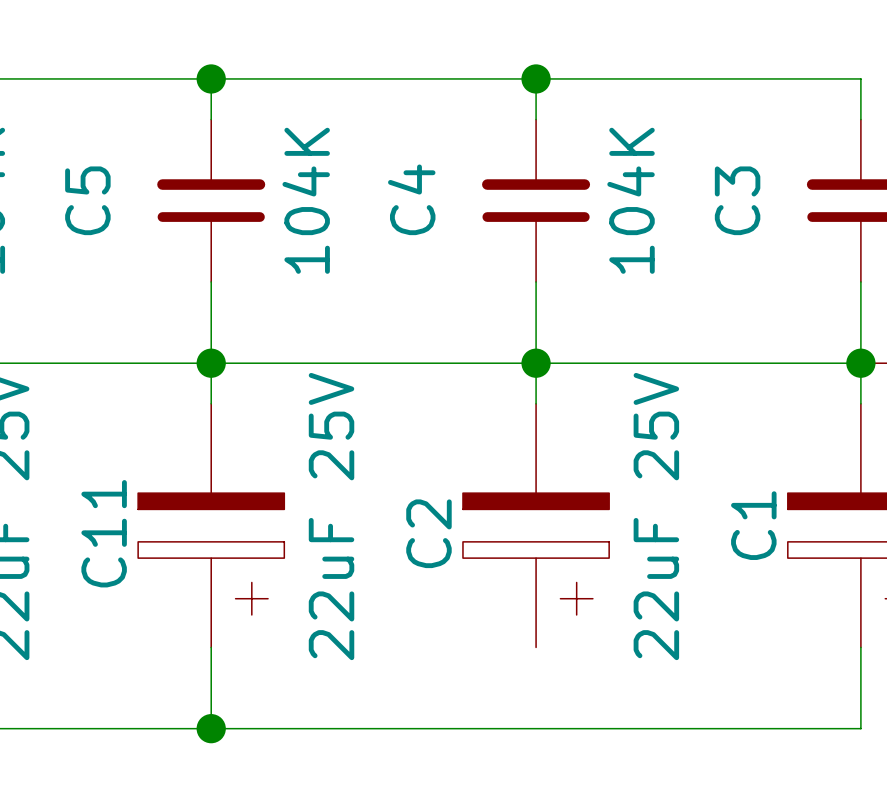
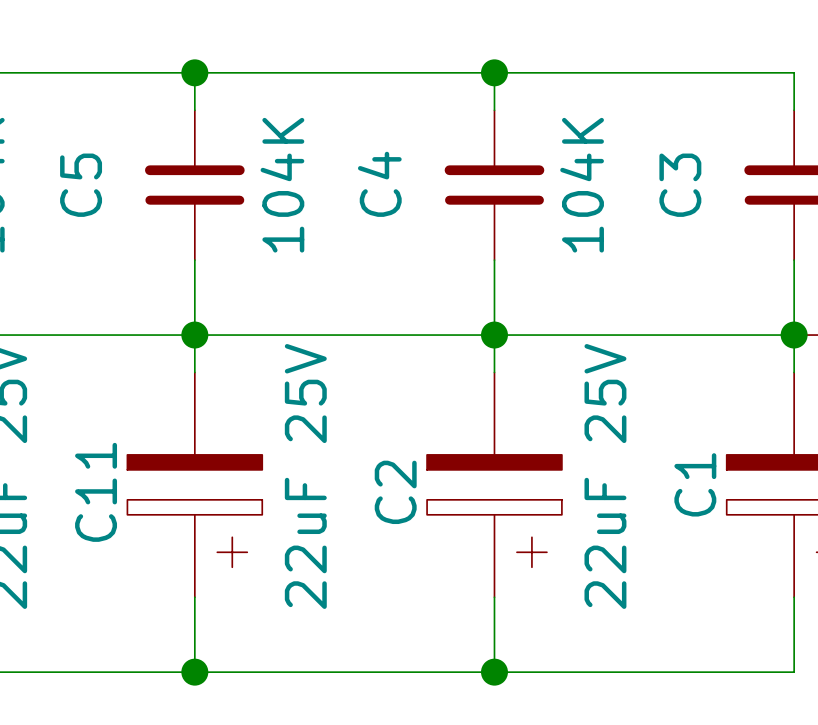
wire: none -> (494, 597) (494, 672)
junction: none -> (494, 672)

